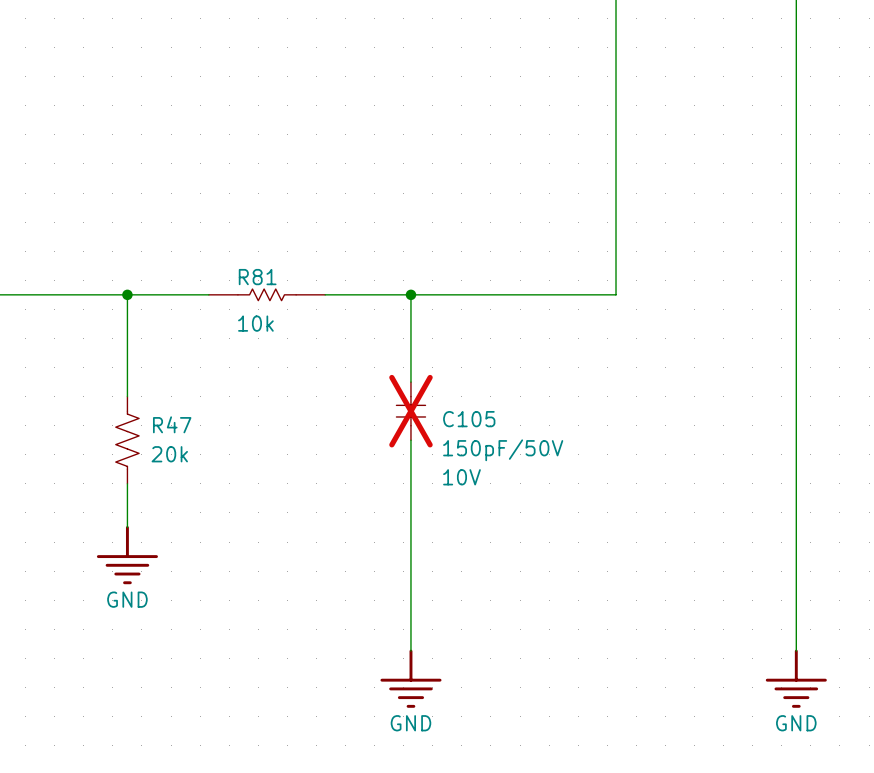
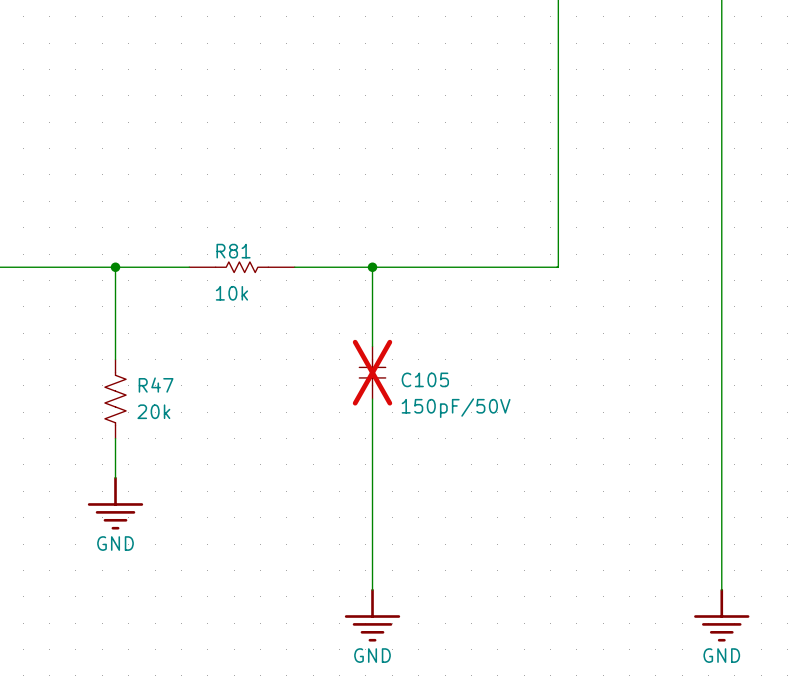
C105 text: 10V (461, 477) -> none

